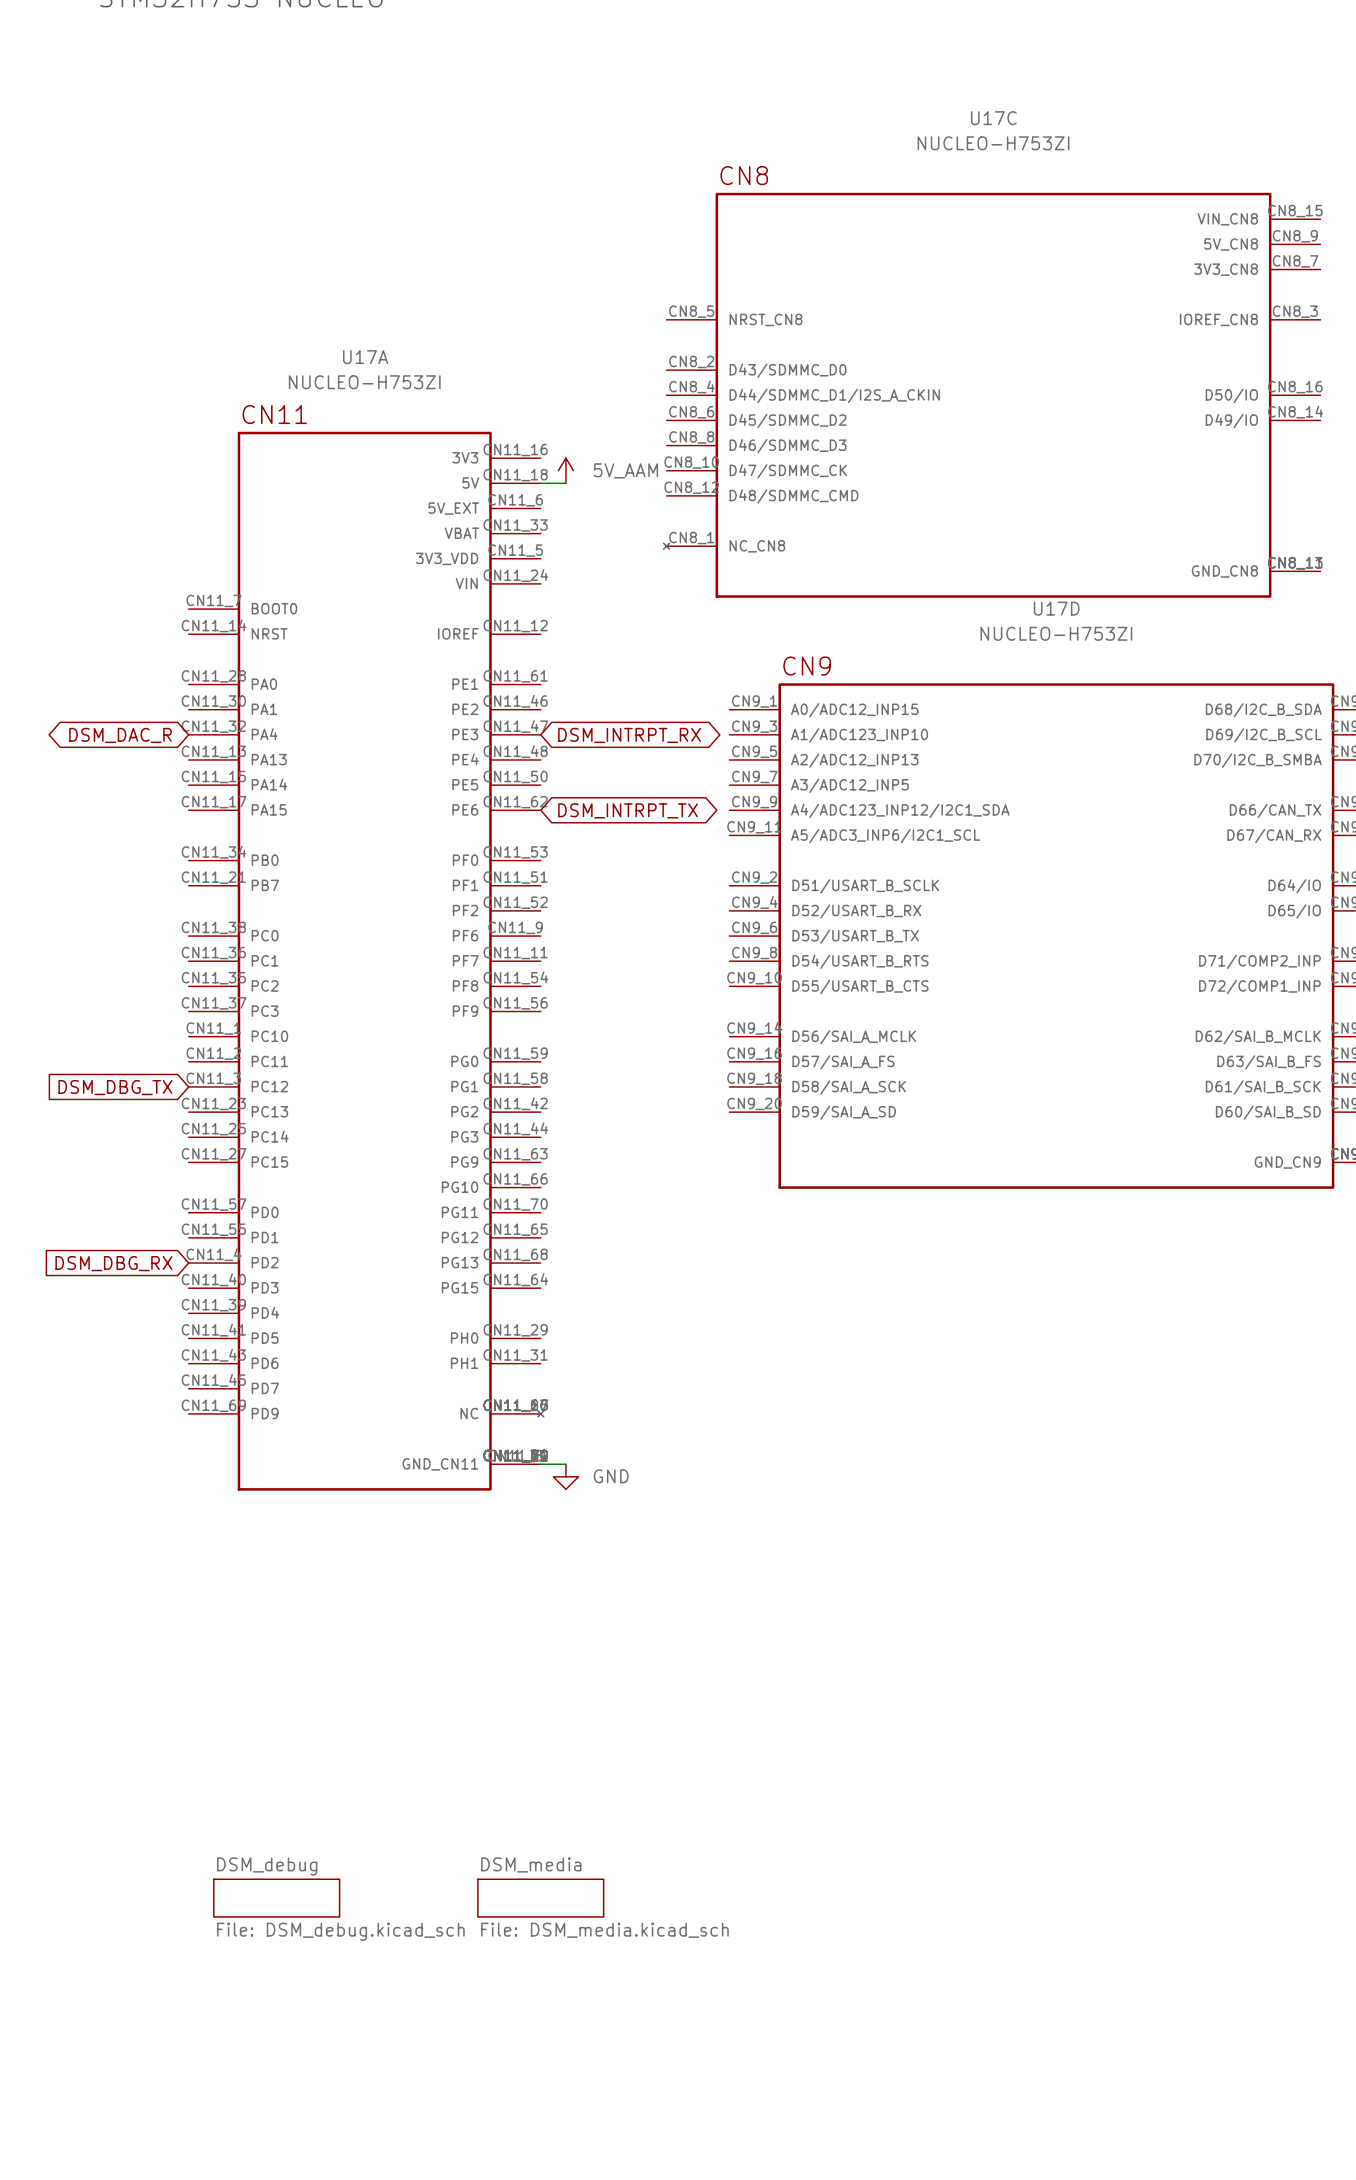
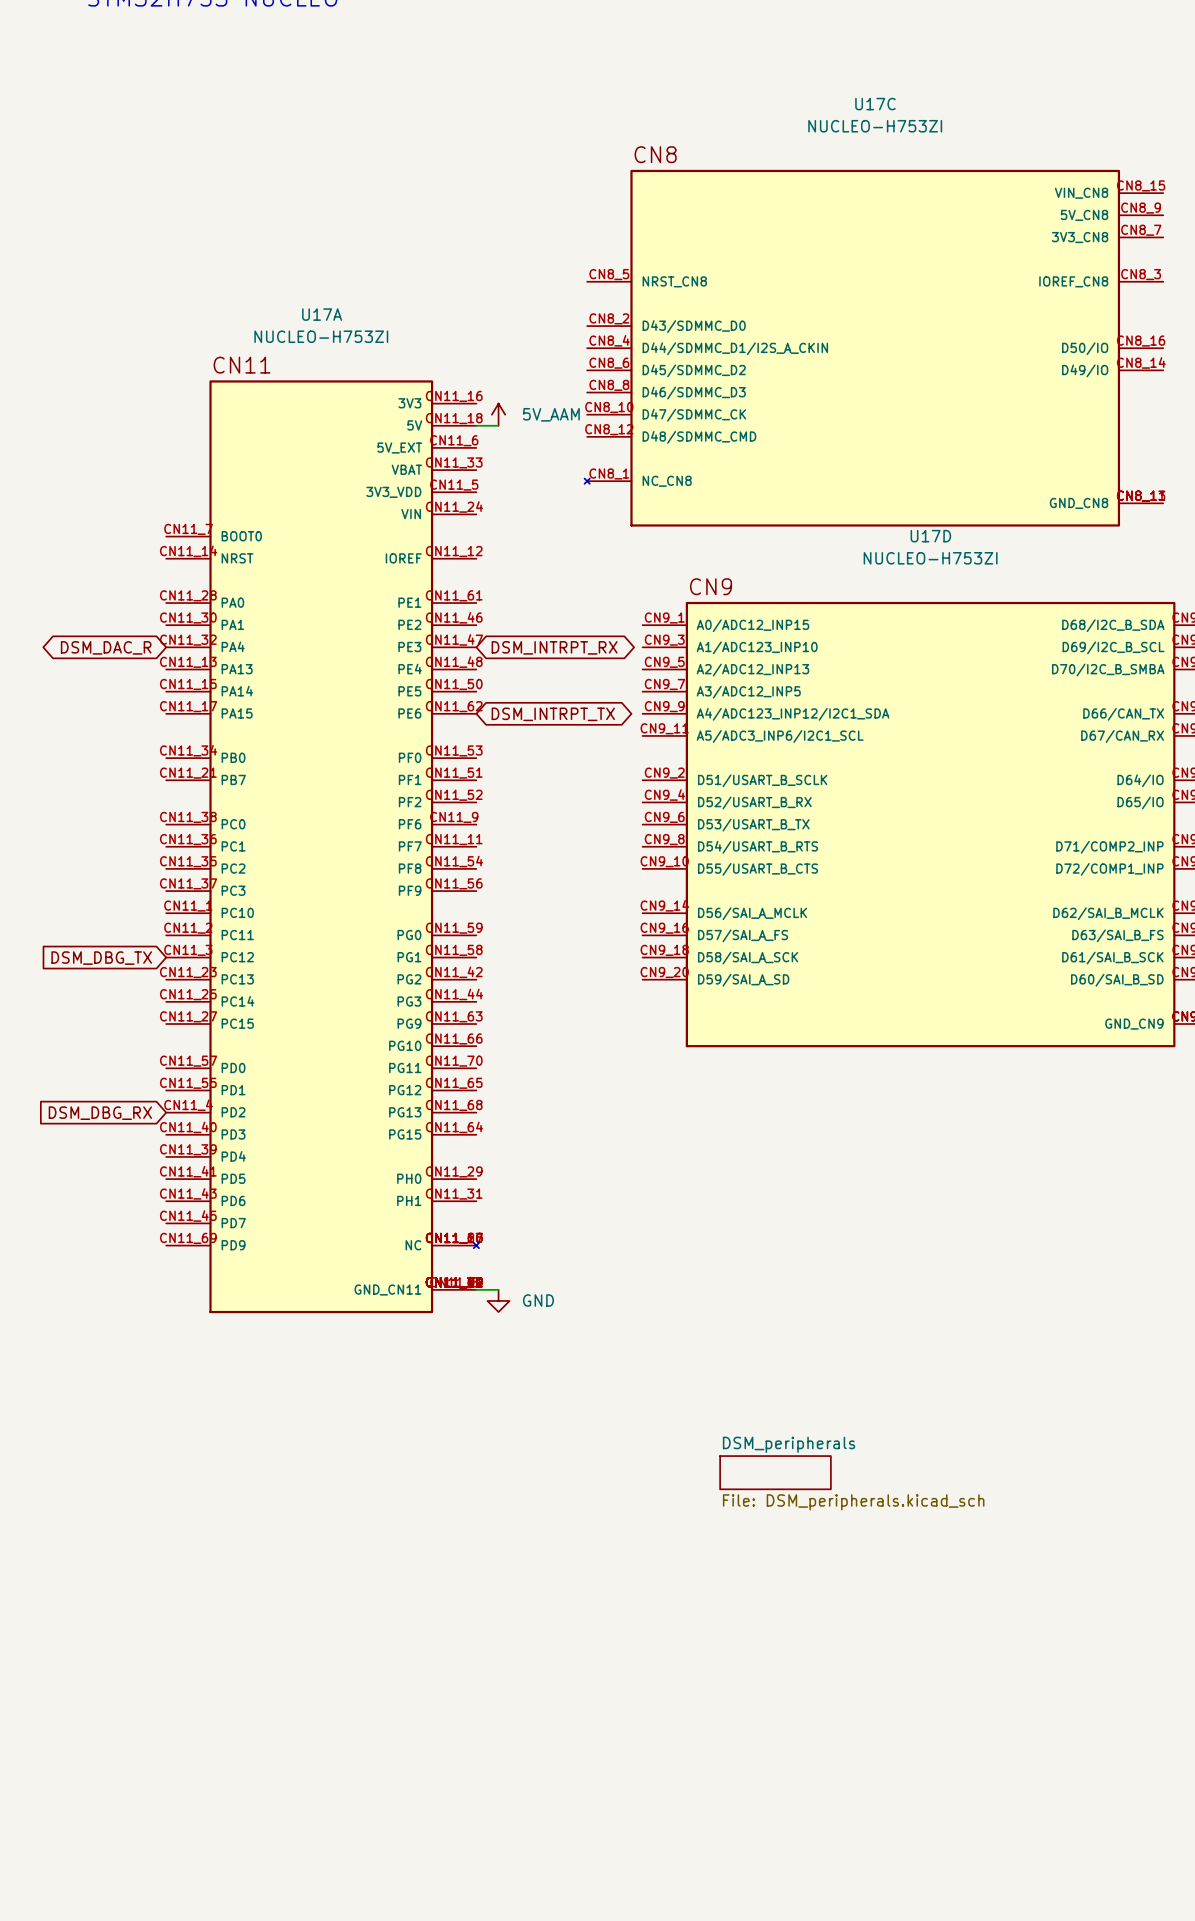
sheet DSM_peripherals: none -> File: DSM_peripherals.kicad_sch (775, 1472)
sheet DSM_debug: File: DSM_debug.kicad_sch (276, 1898) -> none
sheet DSM_media: File: DSM_media.kicad_sch (540, 1898) -> none

